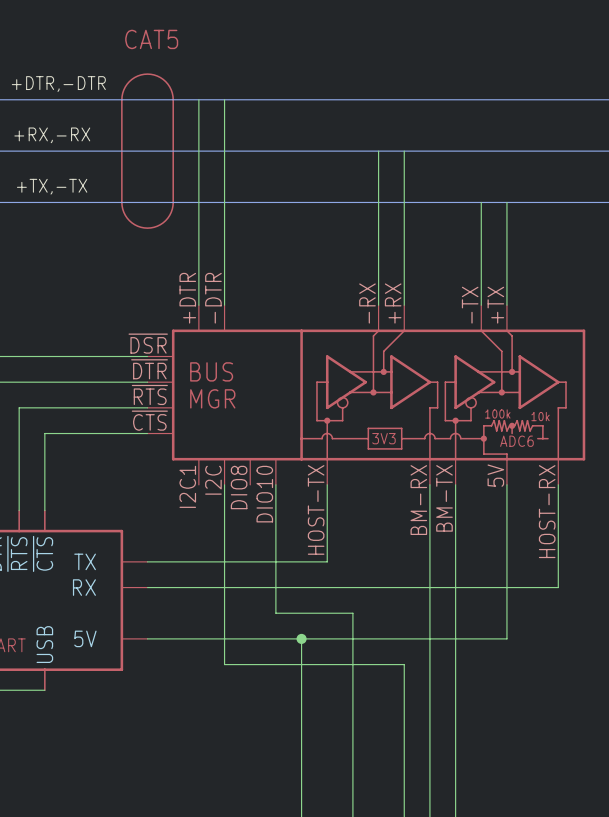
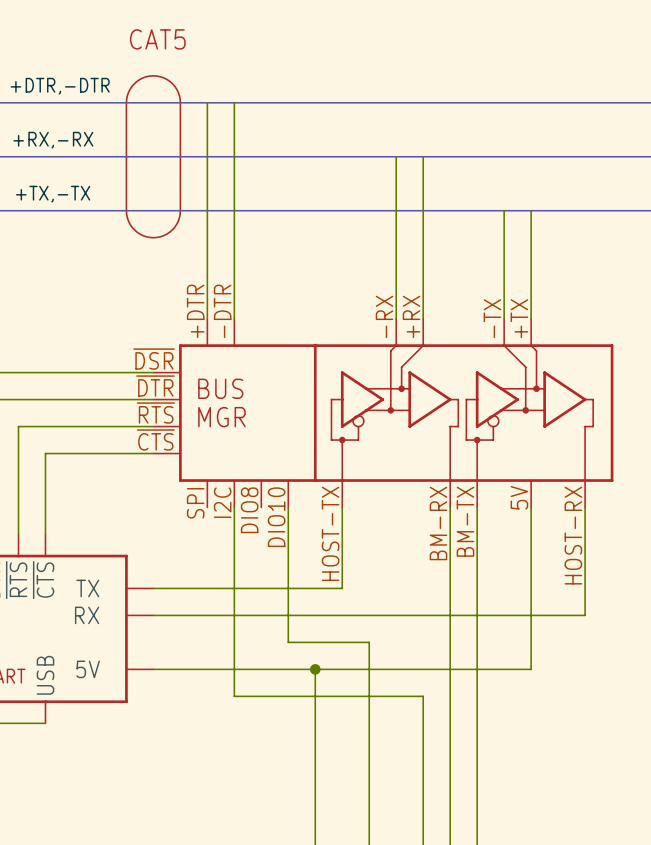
part symbol: [147, 305, 586, 485] -> [153, 318, 614, 508]

